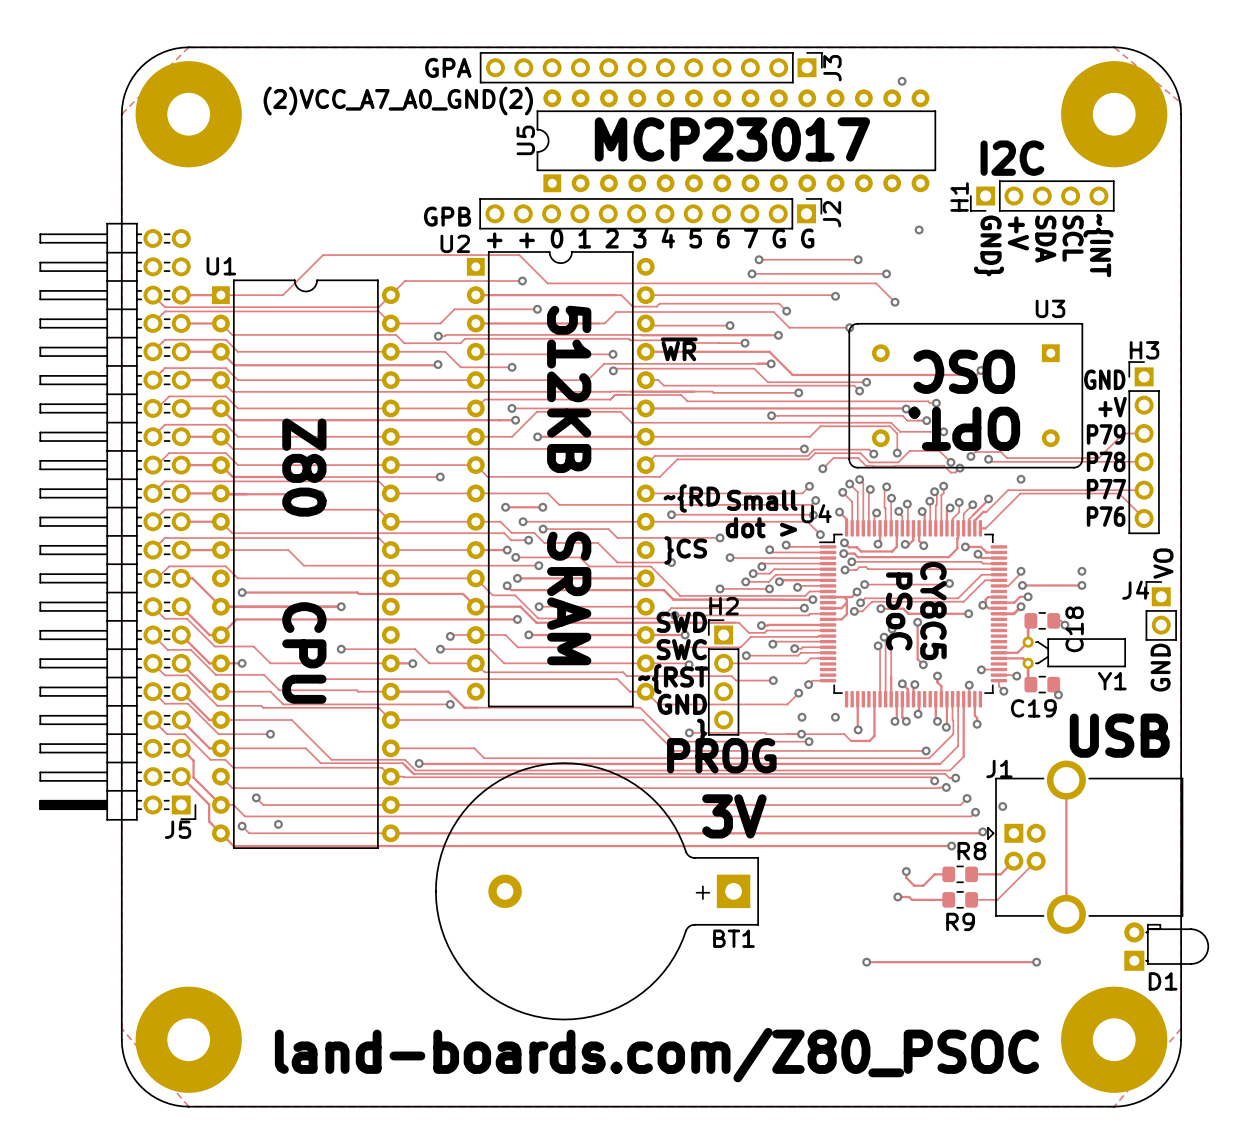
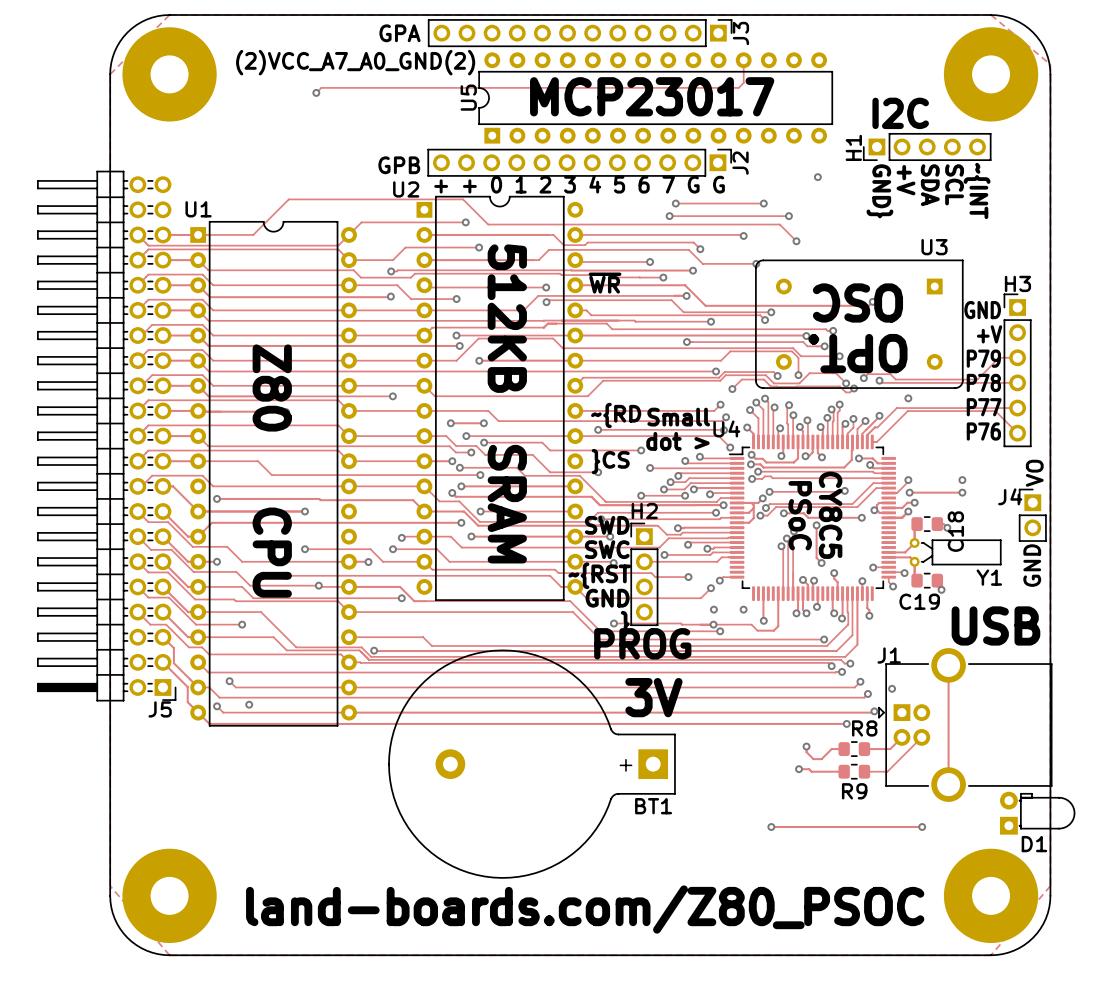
via: (902, 81) -> none
track: none -> (743, 60) (743, 82) (738, 87) (321, 87) (316, 92)
via: none -> (316, 92)
via: none -> (318, 585)

